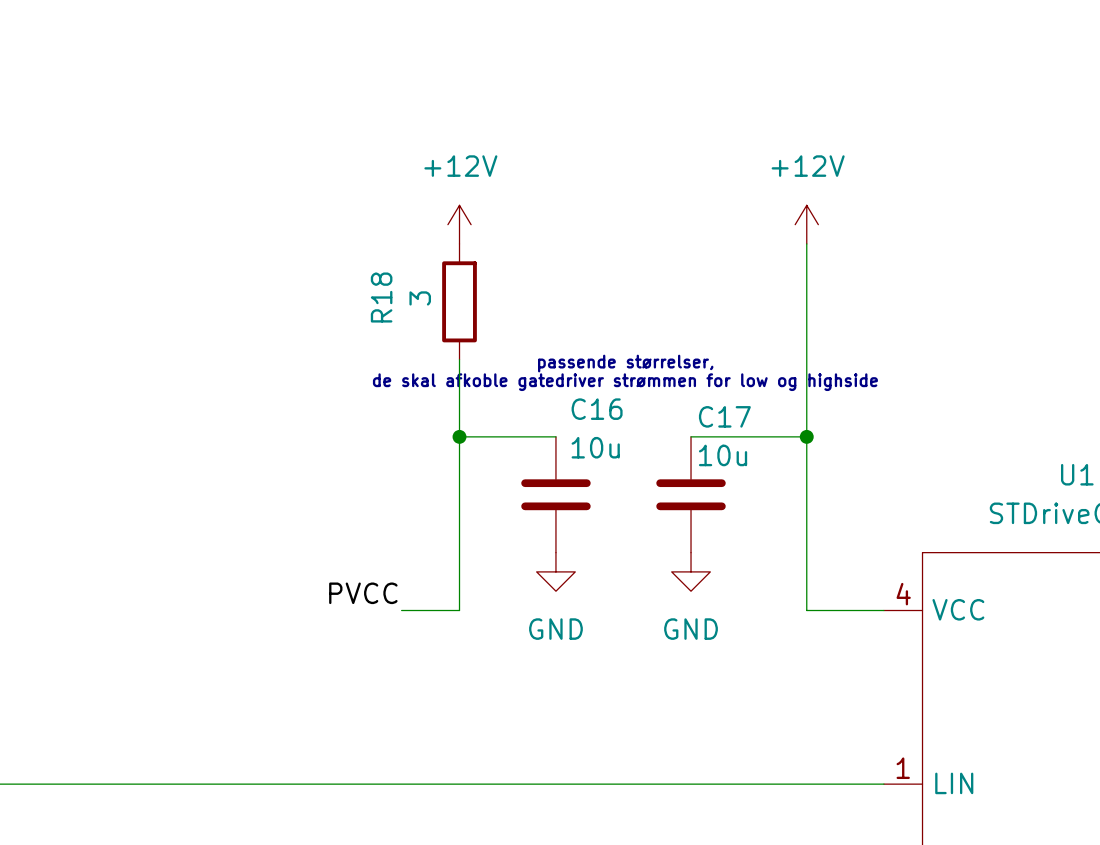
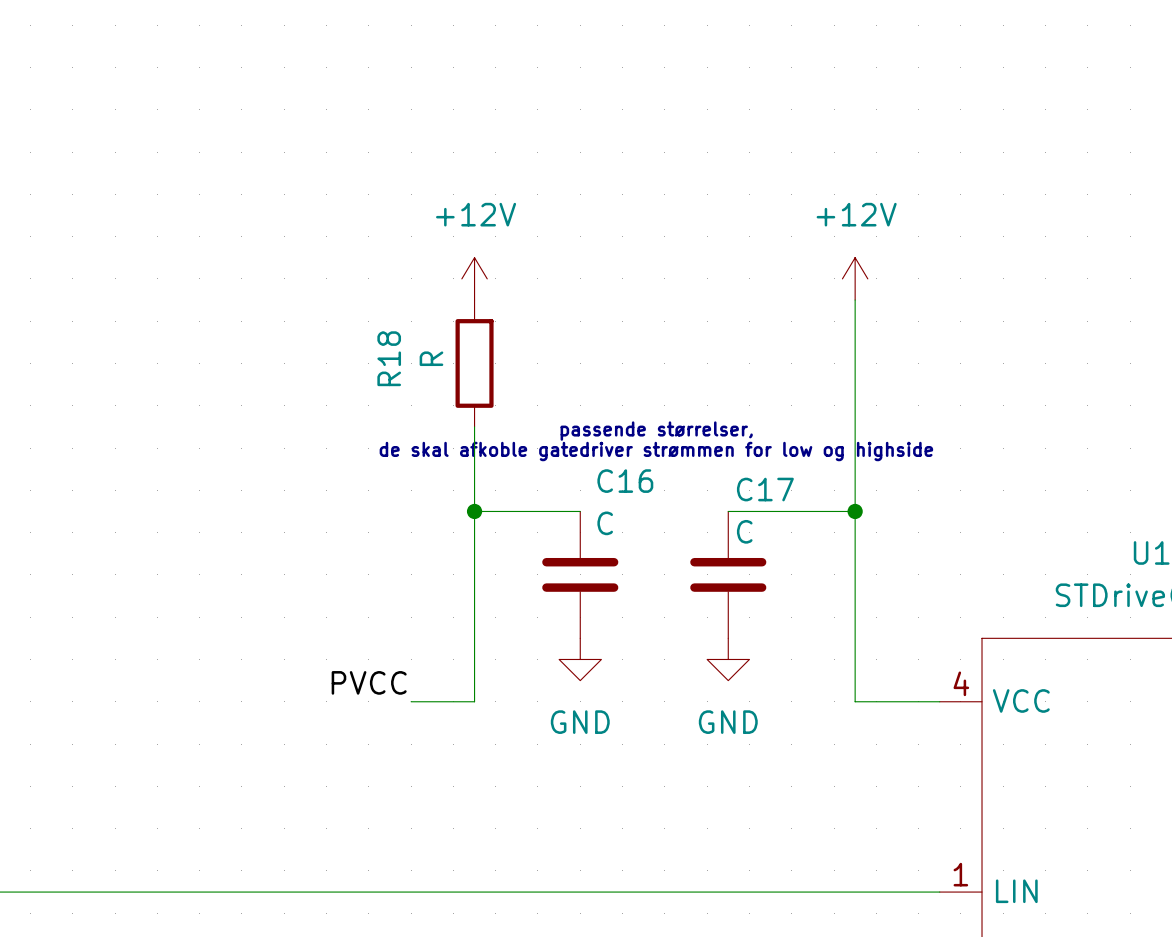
R18 value: 3 (420, 298) -> R (431, 358)
C16 value: 10u (595, 447) -> C (605, 523)
C17 value: 10u (723, 455) -> C (744, 531)

